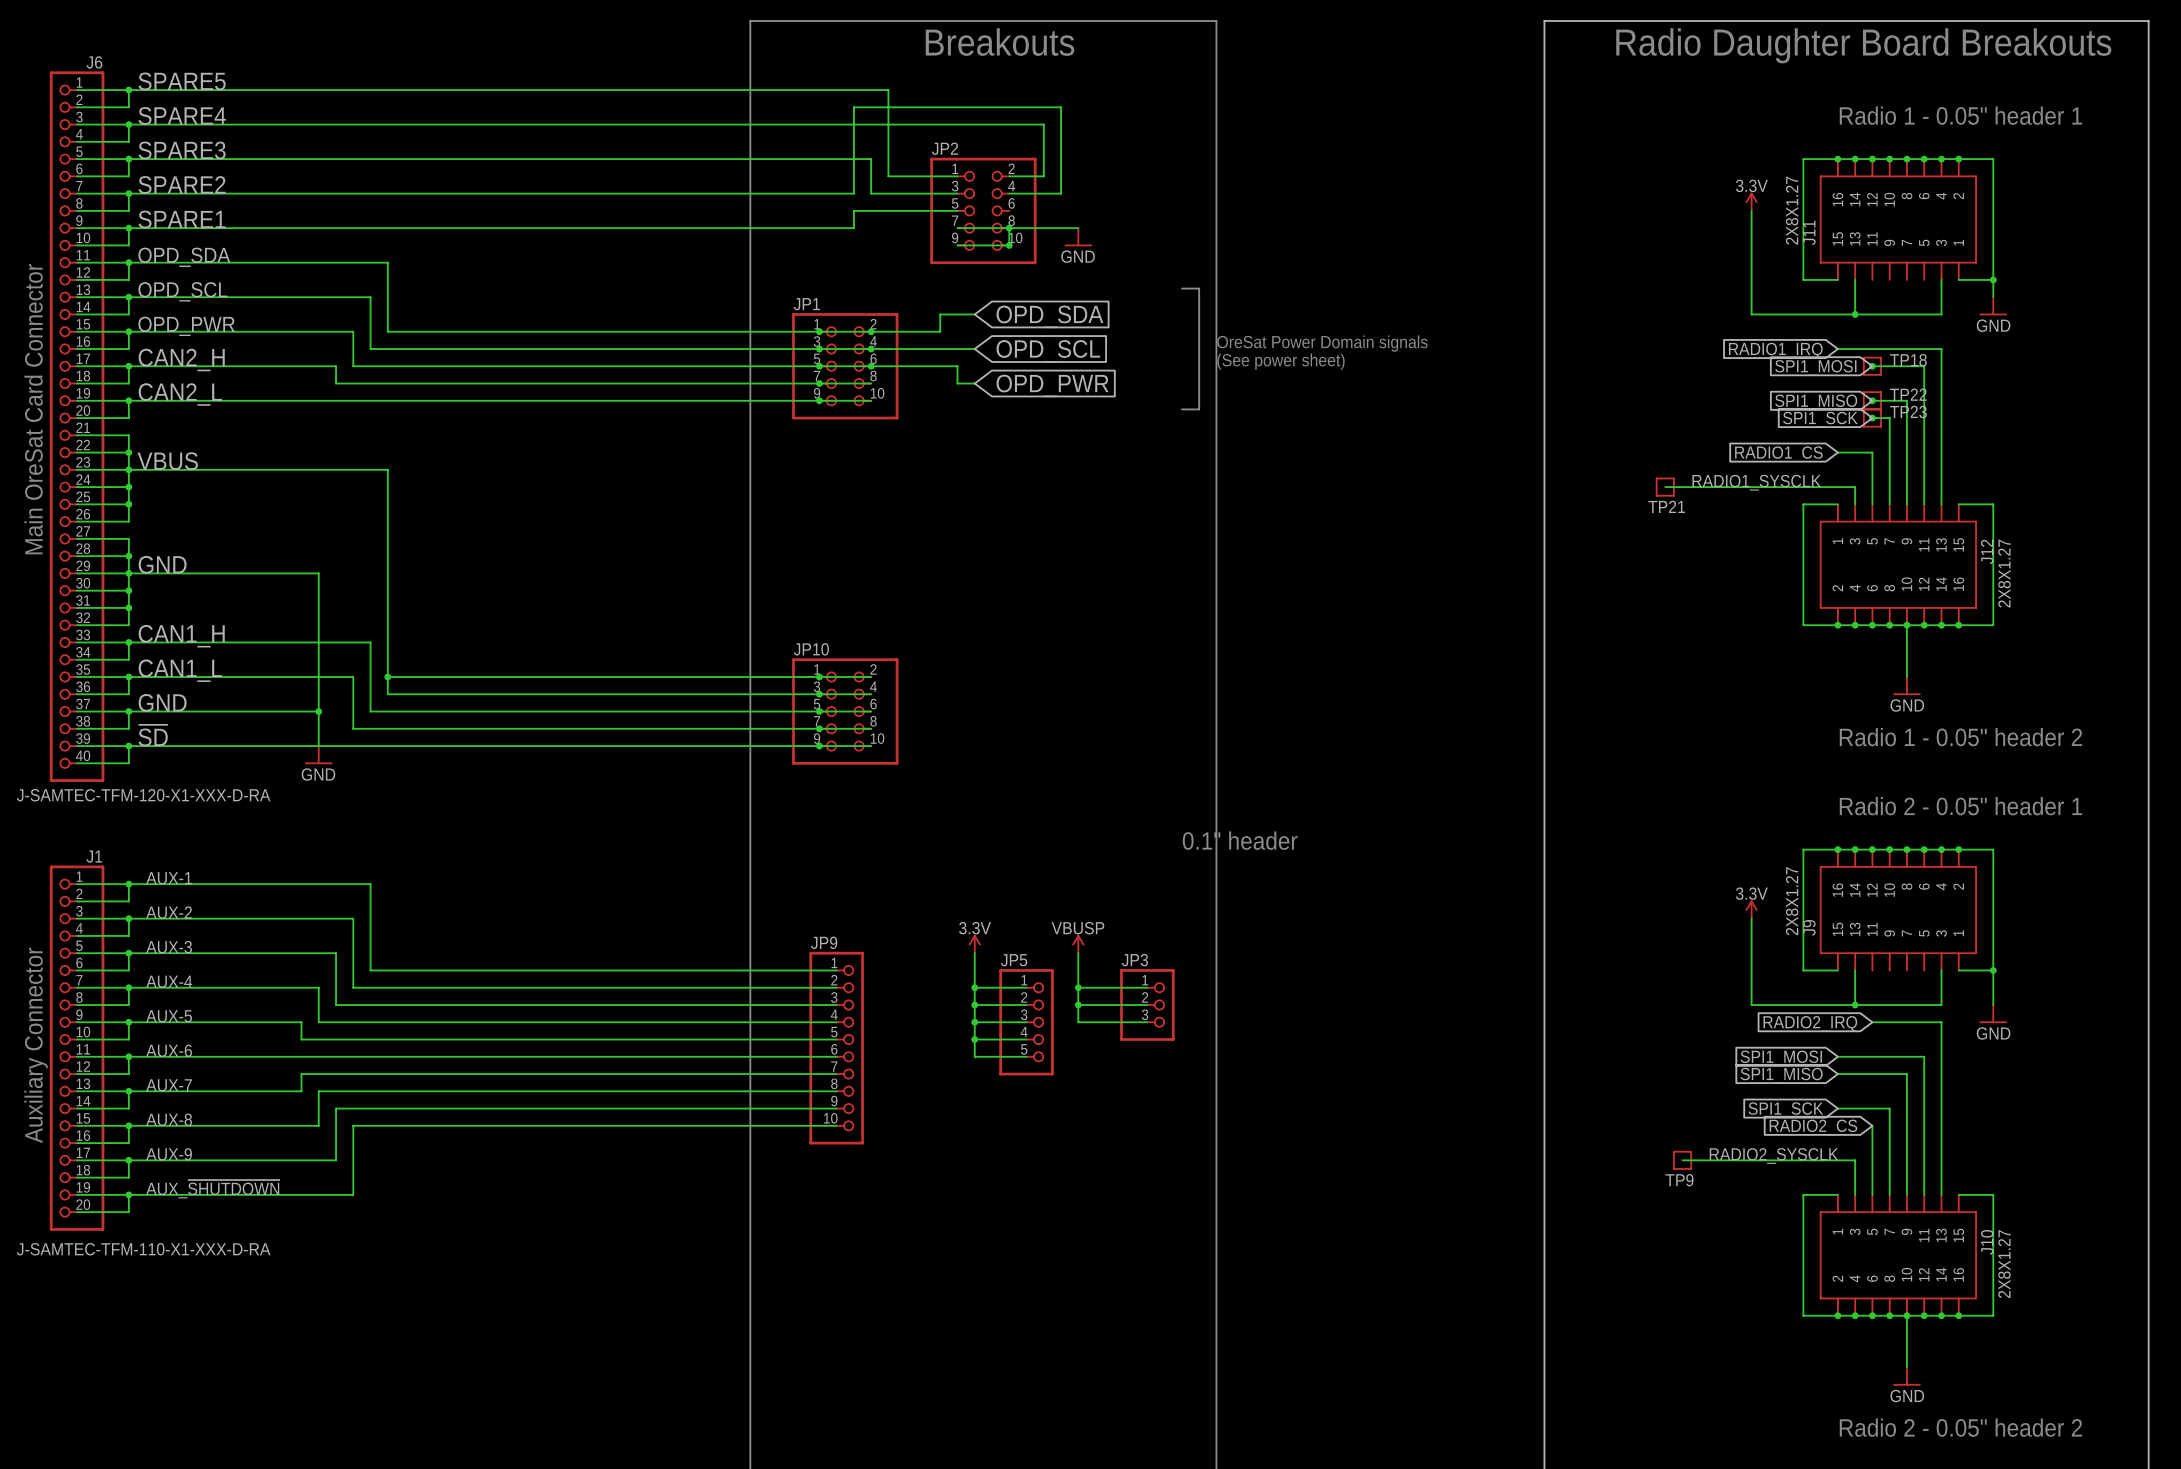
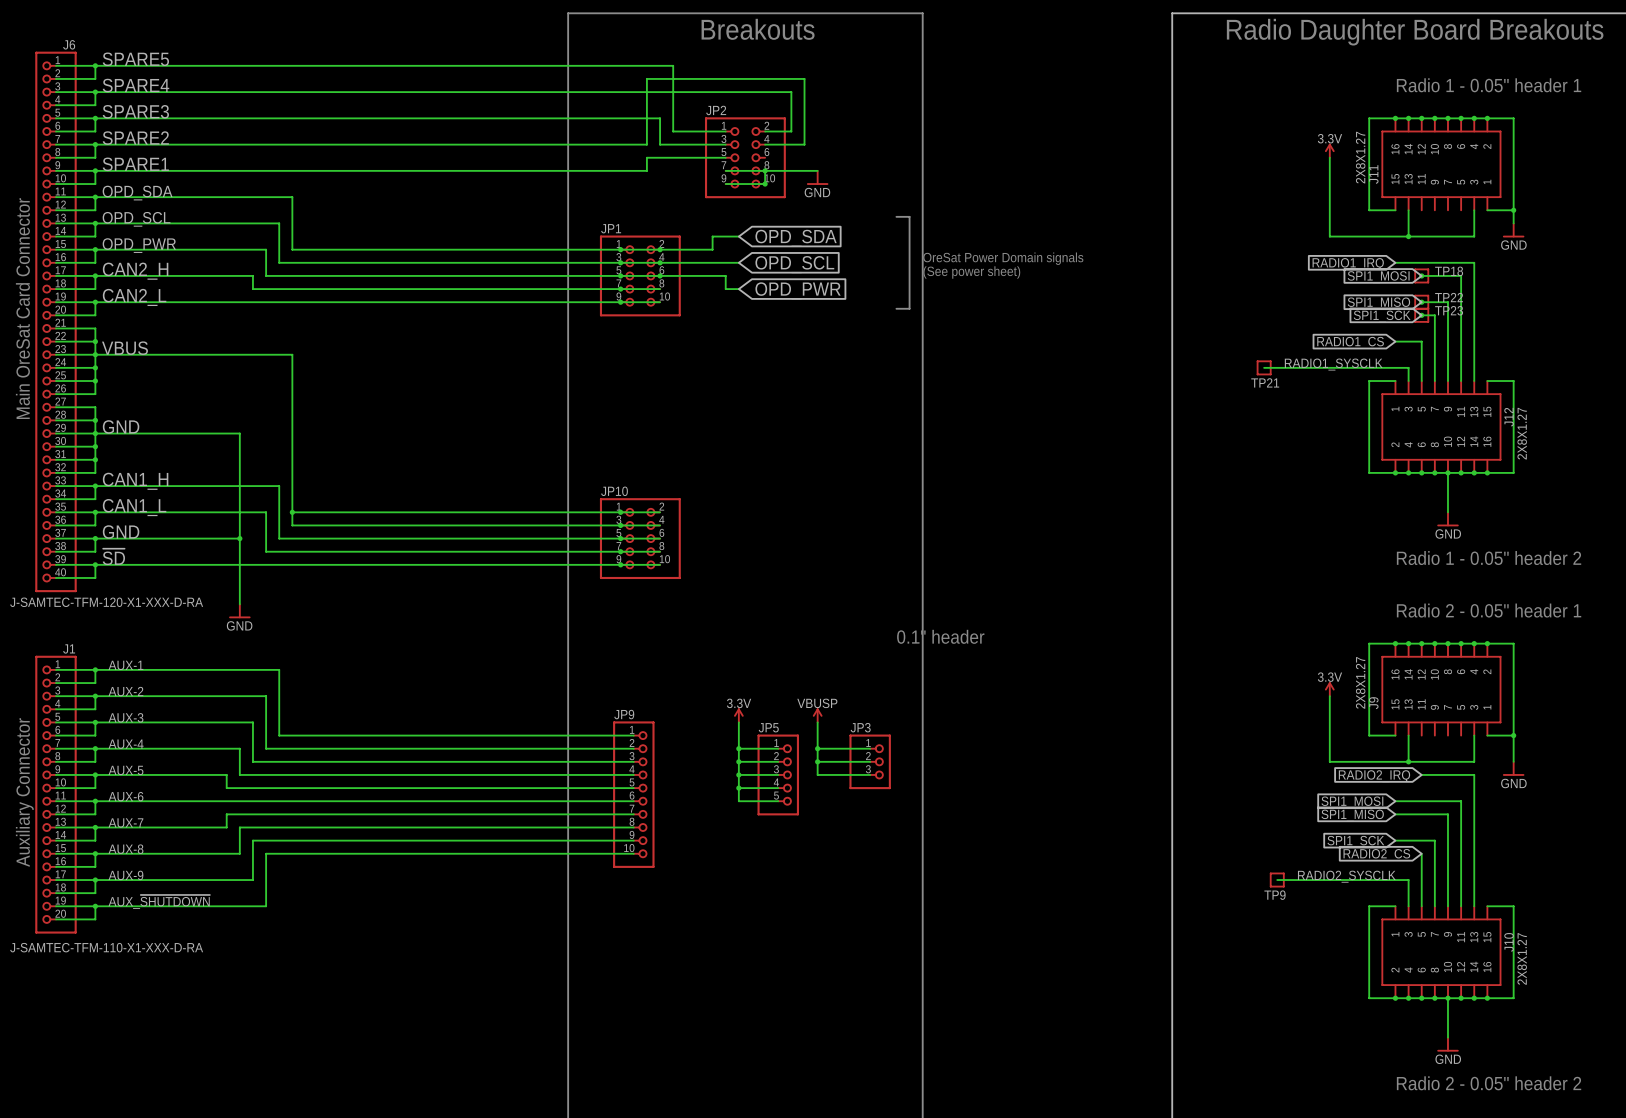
wire: none -> (239, 564) (239, 604)
power symbol position: GND (318, 755) -> GND (239, 611)

